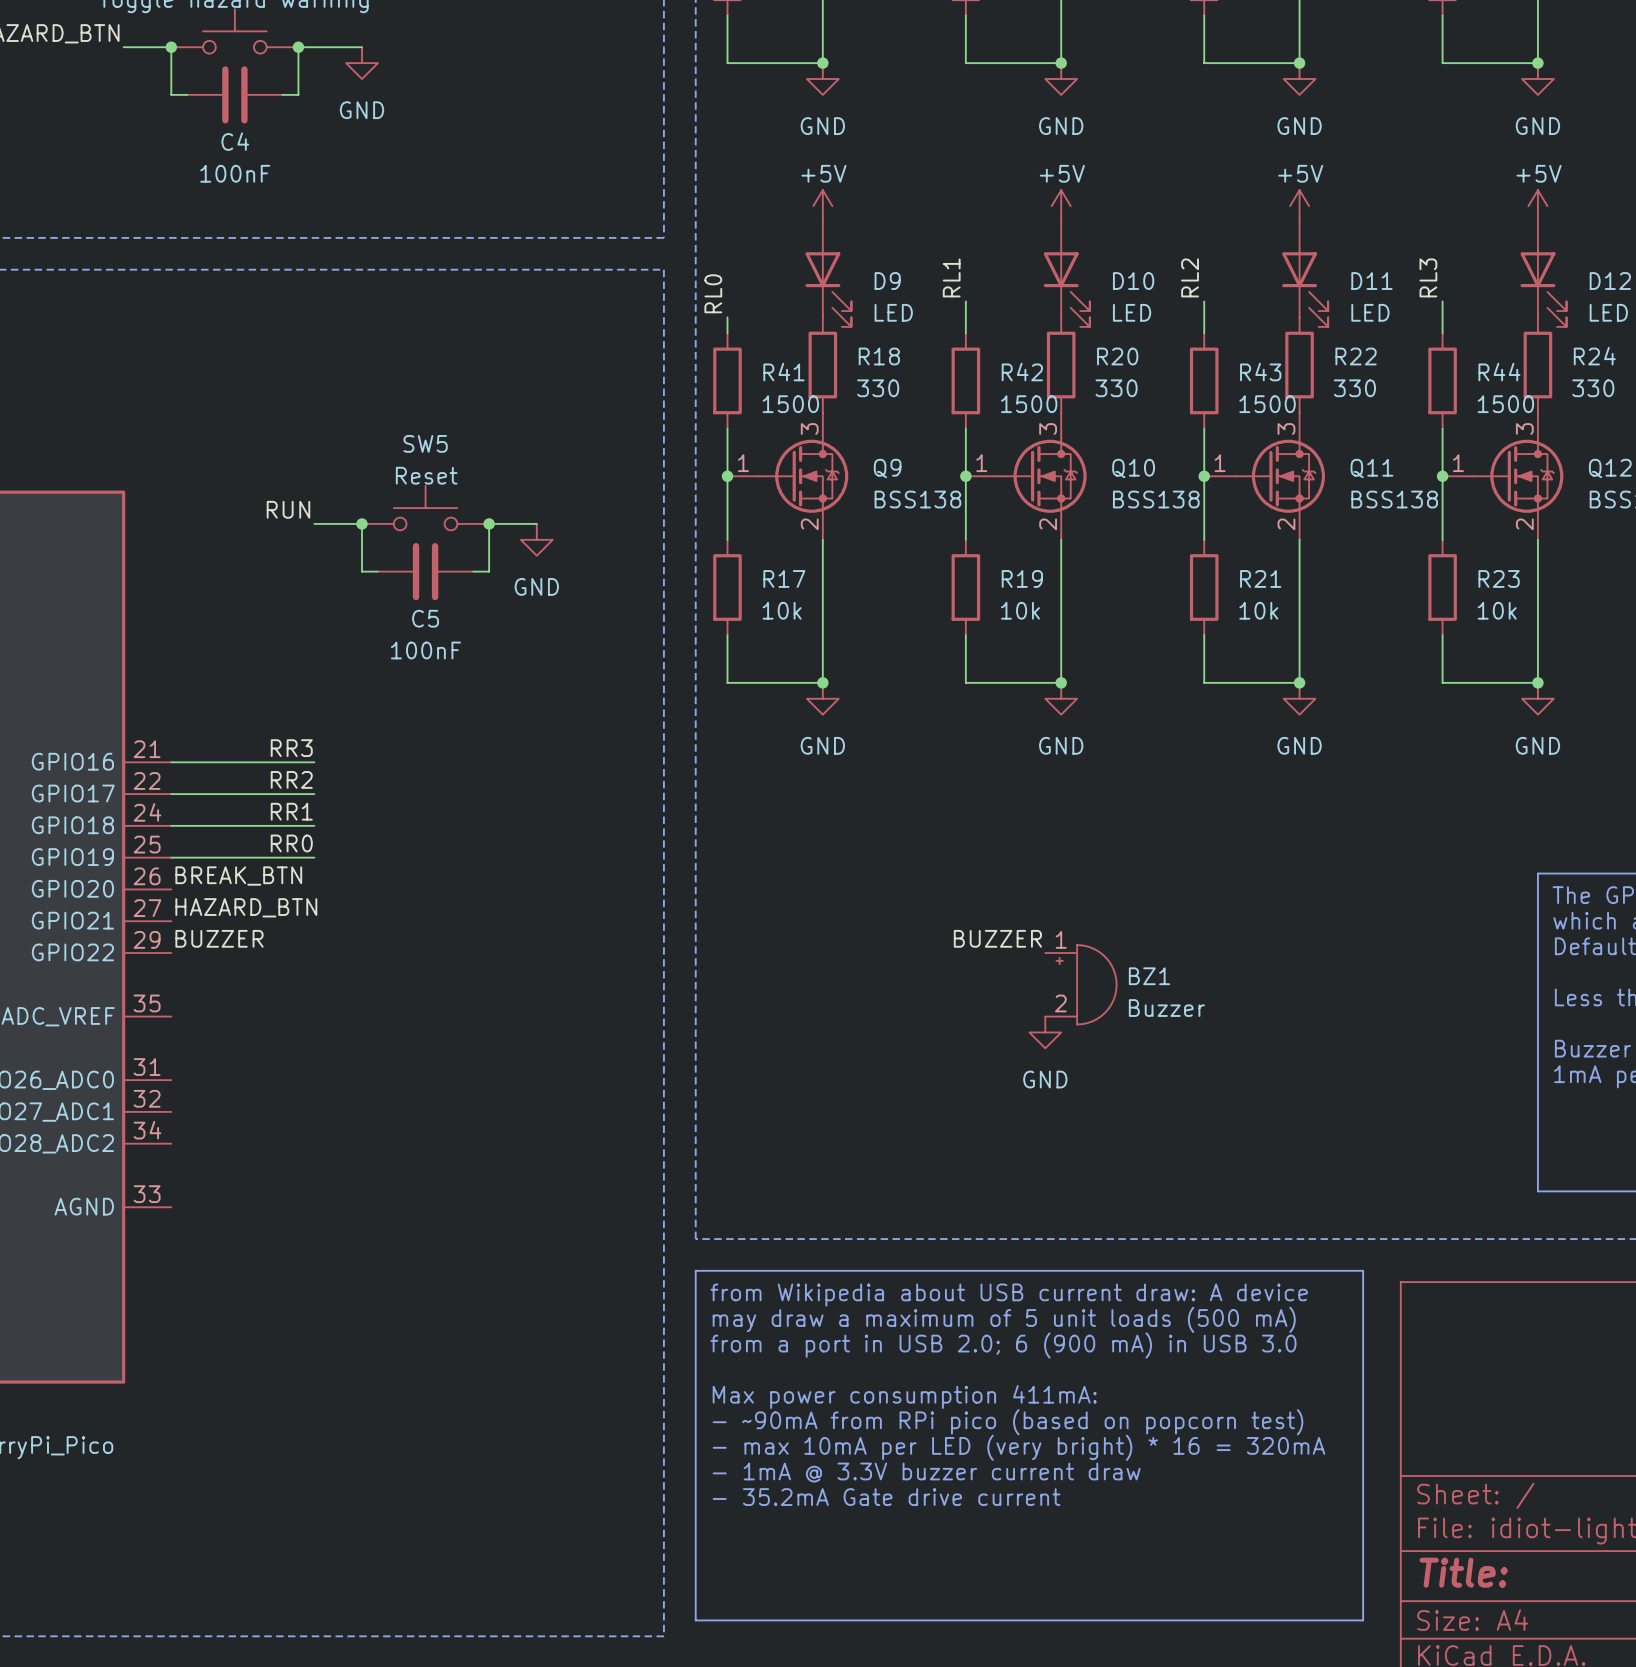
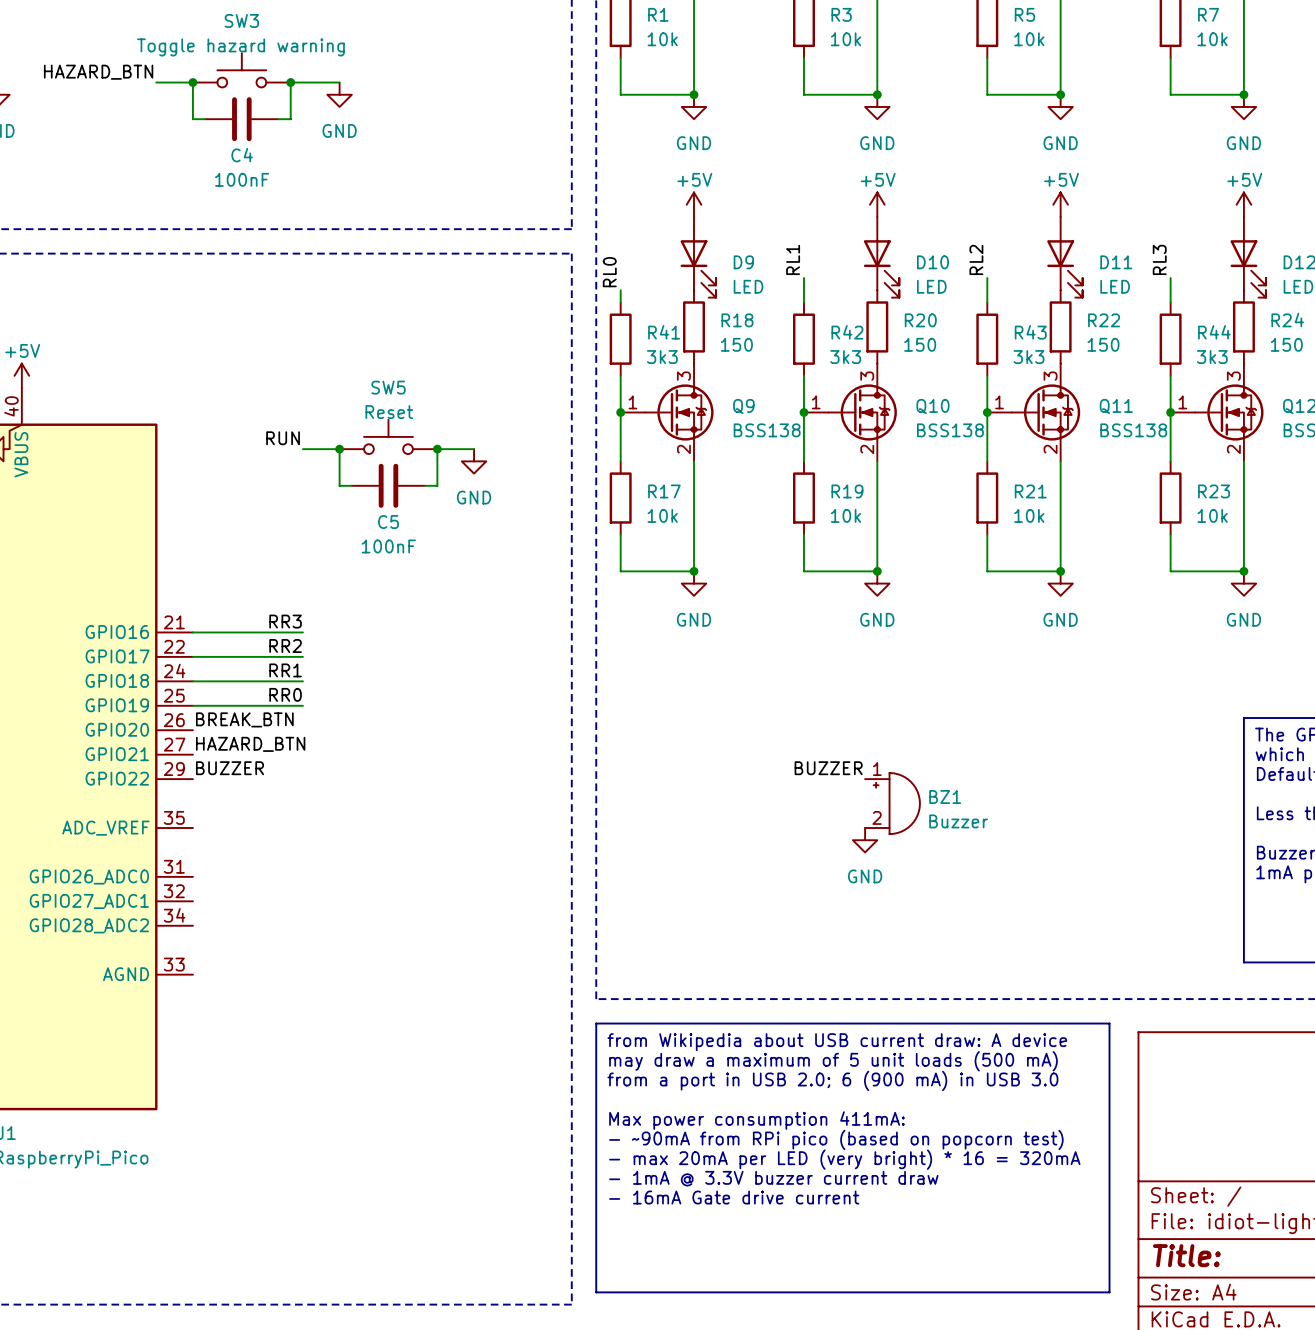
R18 value: 330 (878, 388) -> 150 (736, 344)
R20 value: 330 (1116, 388) -> 150 (920, 344)
R22 value: 330 (1354, 388) -> 150 (1103, 344)
R24 value: 330 (1593, 388) -> 150 (1286, 344)
R41 value: 1500 (790, 404) -> 3k3 (662, 357)
R42 value: 1500 (1029, 404) -> 3k3 (845, 357)
R43 value: 1500 (1267, 404) -> 3k3 (1029, 357)
R44 value: 1500 (1505, 404) -> 3k3 (1212, 357)
text: - max 10mA per LED (very bright) * 16 = 320mA (1018, 1447) -> - max 20mA per LED (very bright) * 16 = 320mA (844, 1159)
text: - 35.2mA Gate drive current (886, 1497) -> - 16mA Gate drive current (734, 1197)

